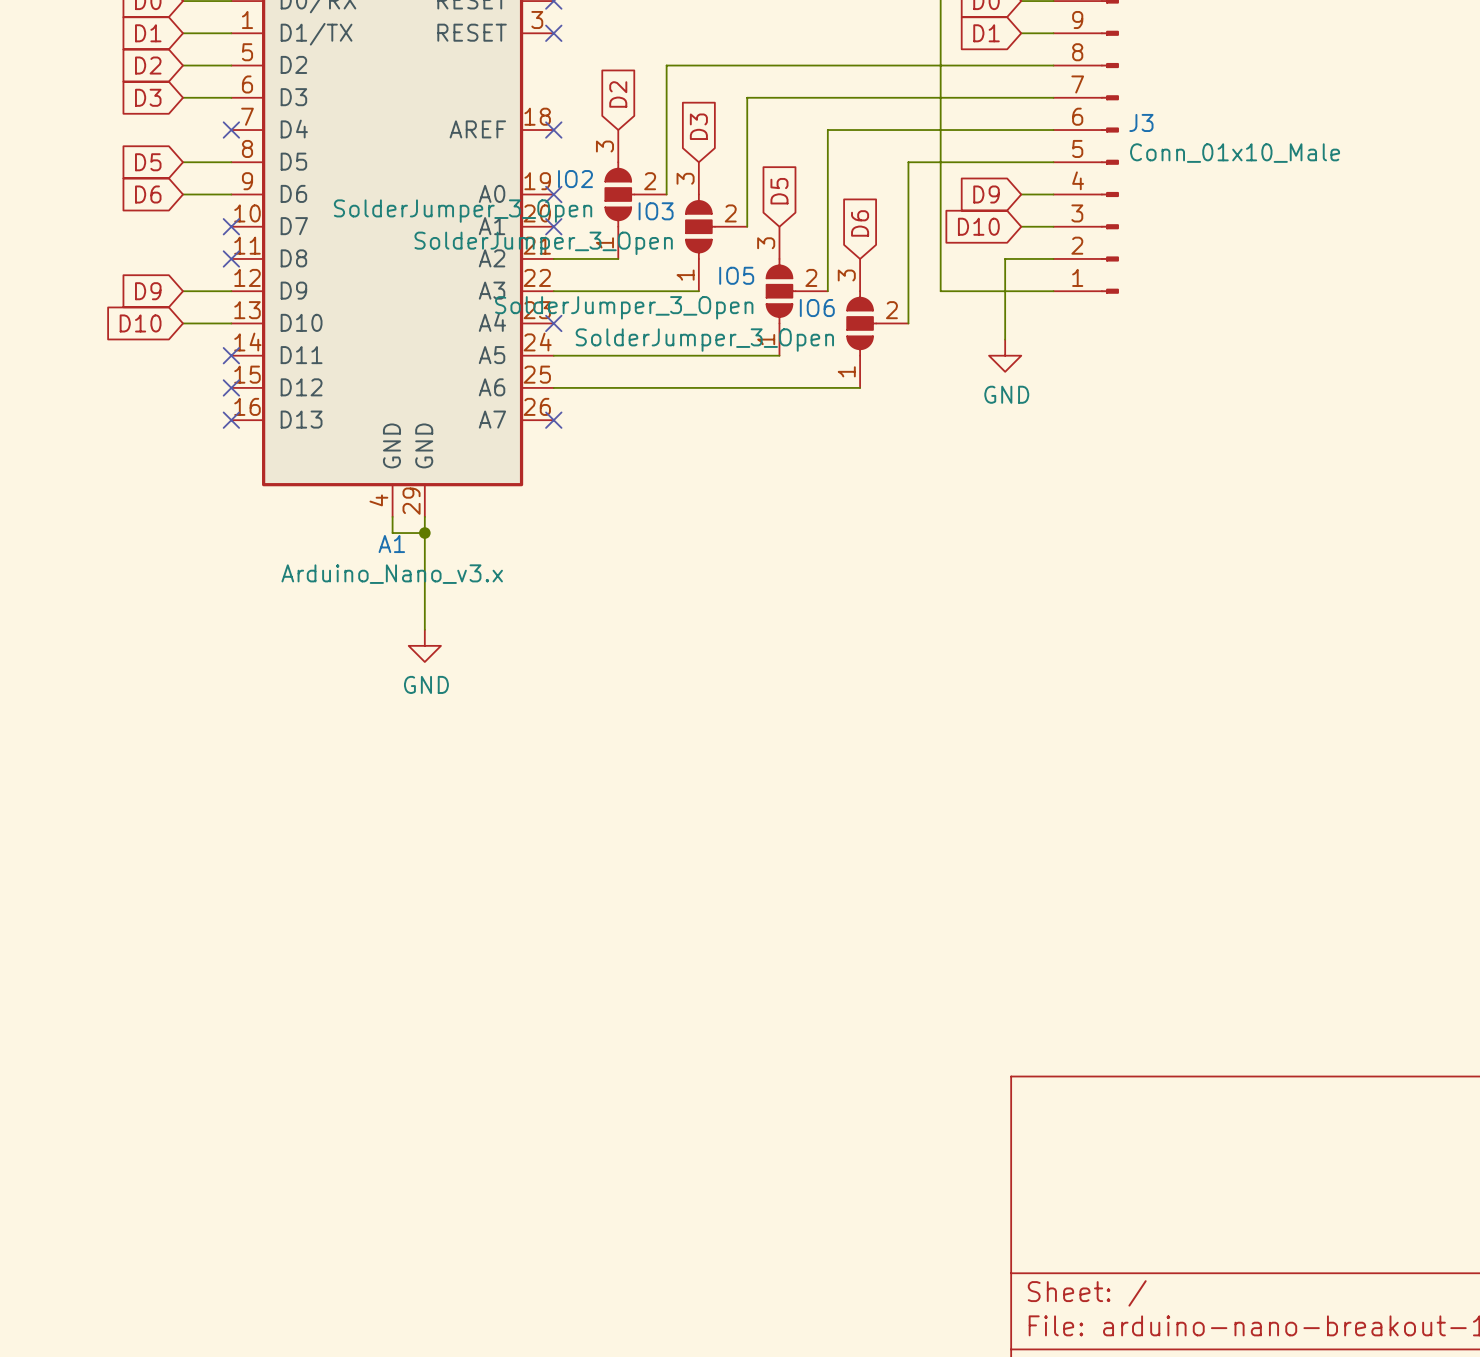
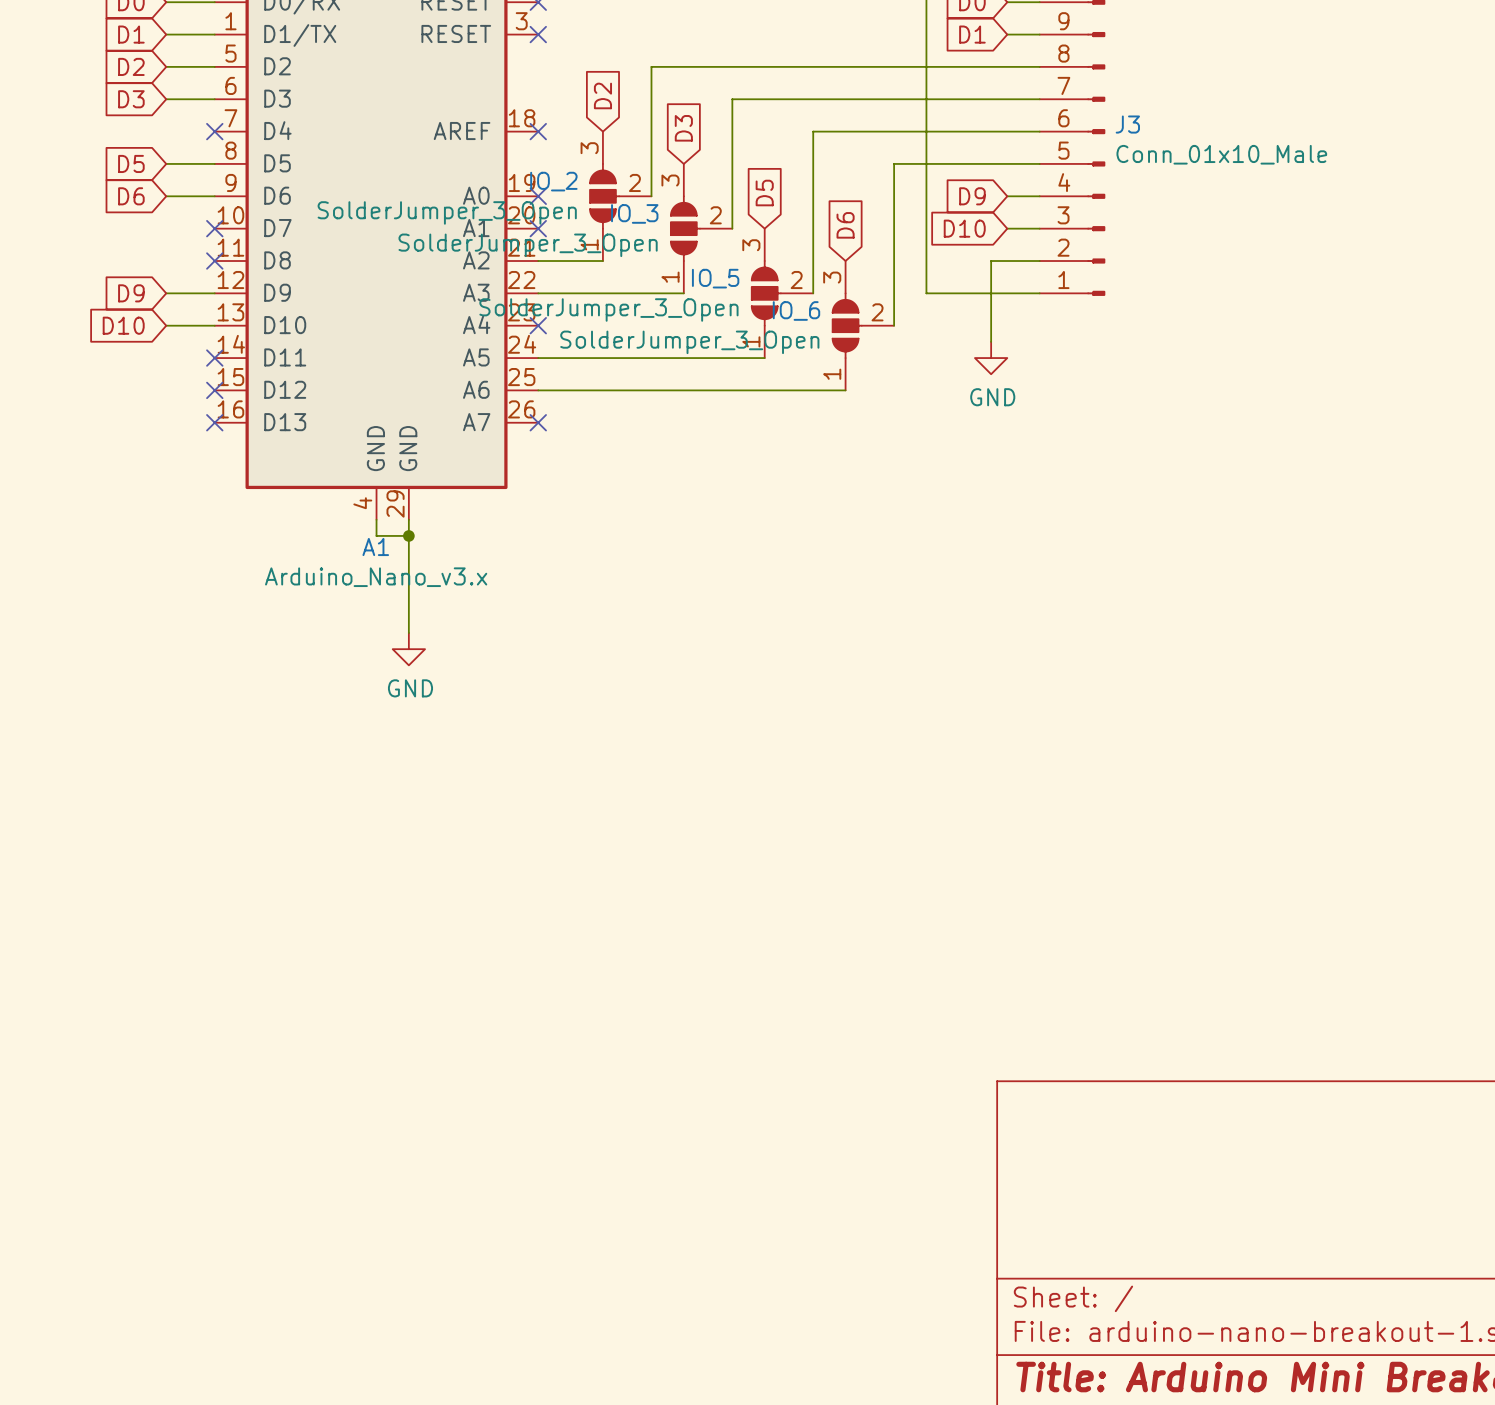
IO2 name: IO2 (575, 179) -> IO_2 (553, 181)
IO3 name: IO3 (656, 211) -> IO_3 (634, 213)
IO5 name: IO5 (736, 275) -> IO_5 (715, 278)
IO6 name: IO6 (817, 308) -> IO_6 (796, 310)

